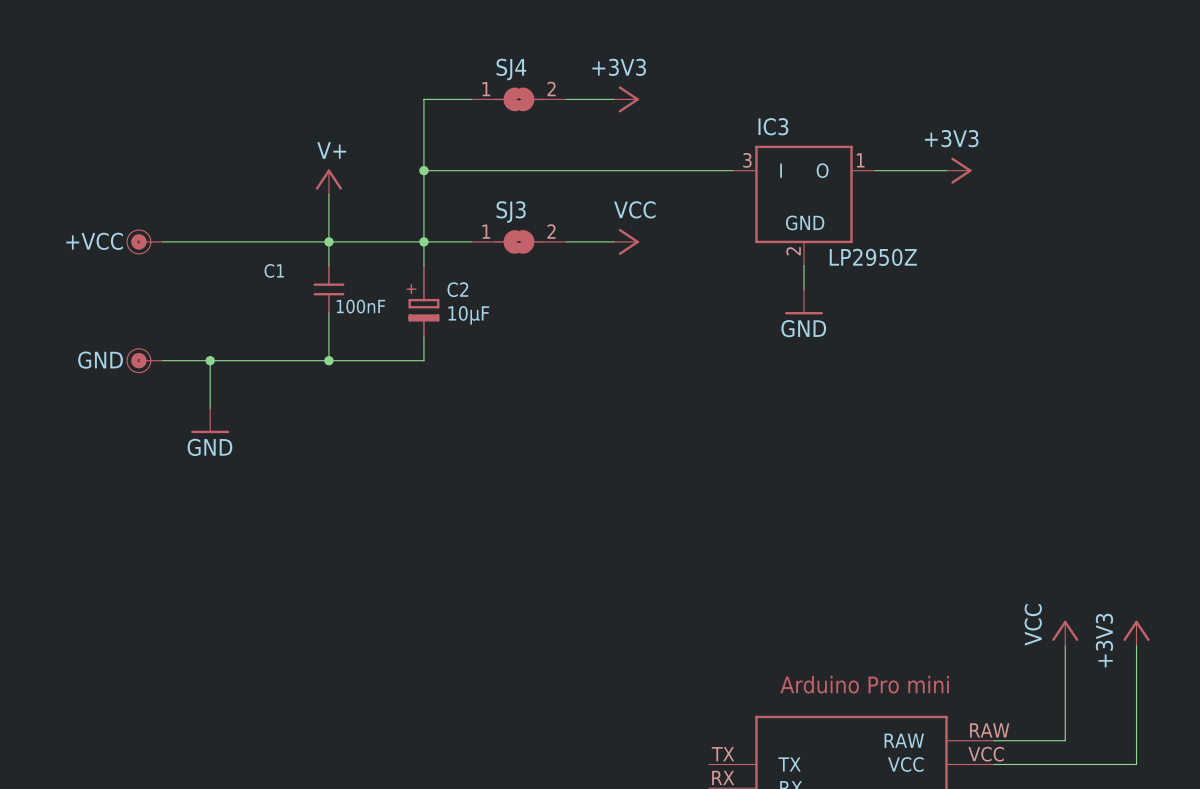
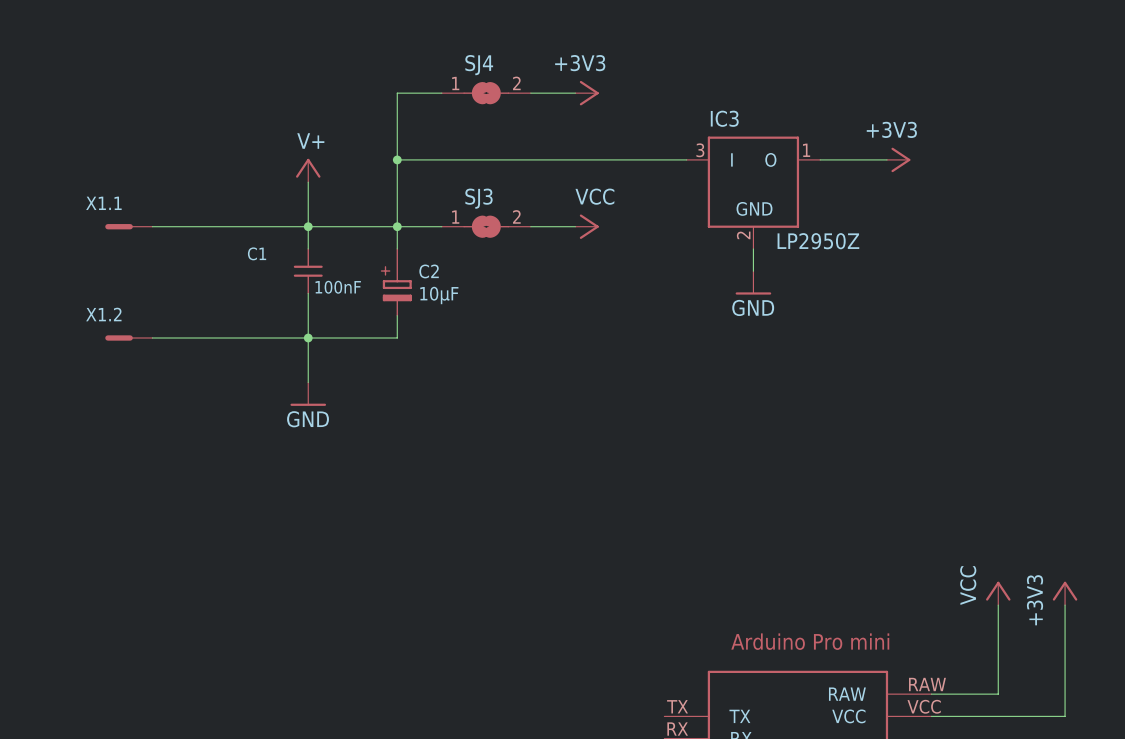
X1.1: none -> (128, 226)
+VCC: (144, 241) -> none
X1.2: none -> (128, 338)
GND: (144, 360) -> none
wire: (210, 360) (210, 408) -> (308, 338) (308, 382)
junction: (210, 360) -> none
power symbol position: GND (210, 420) -> GND (308, 394)

